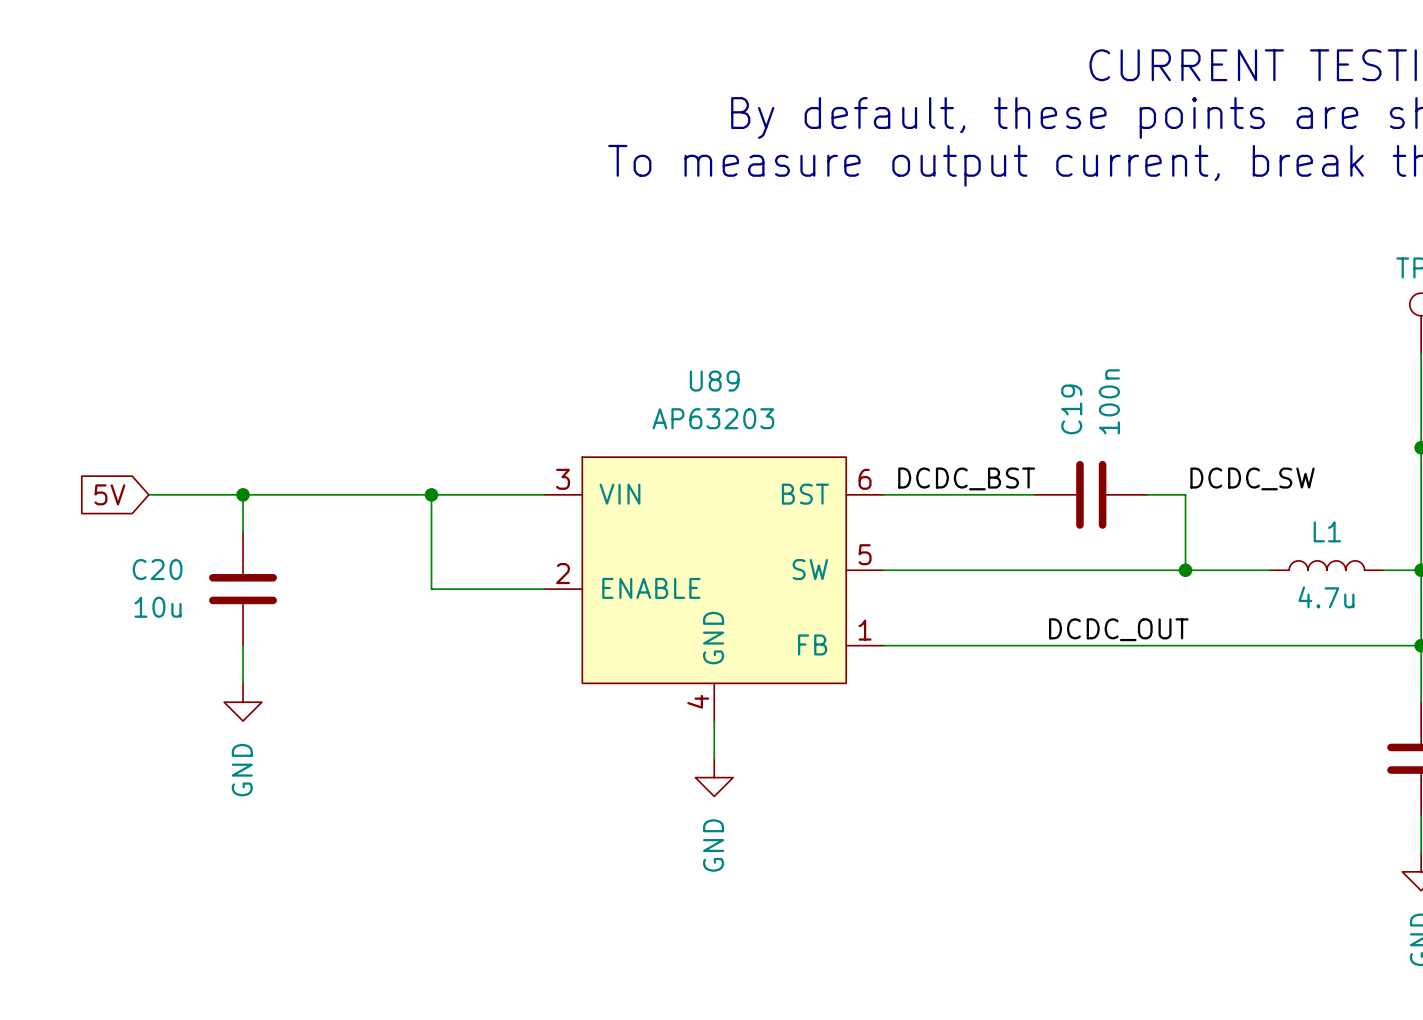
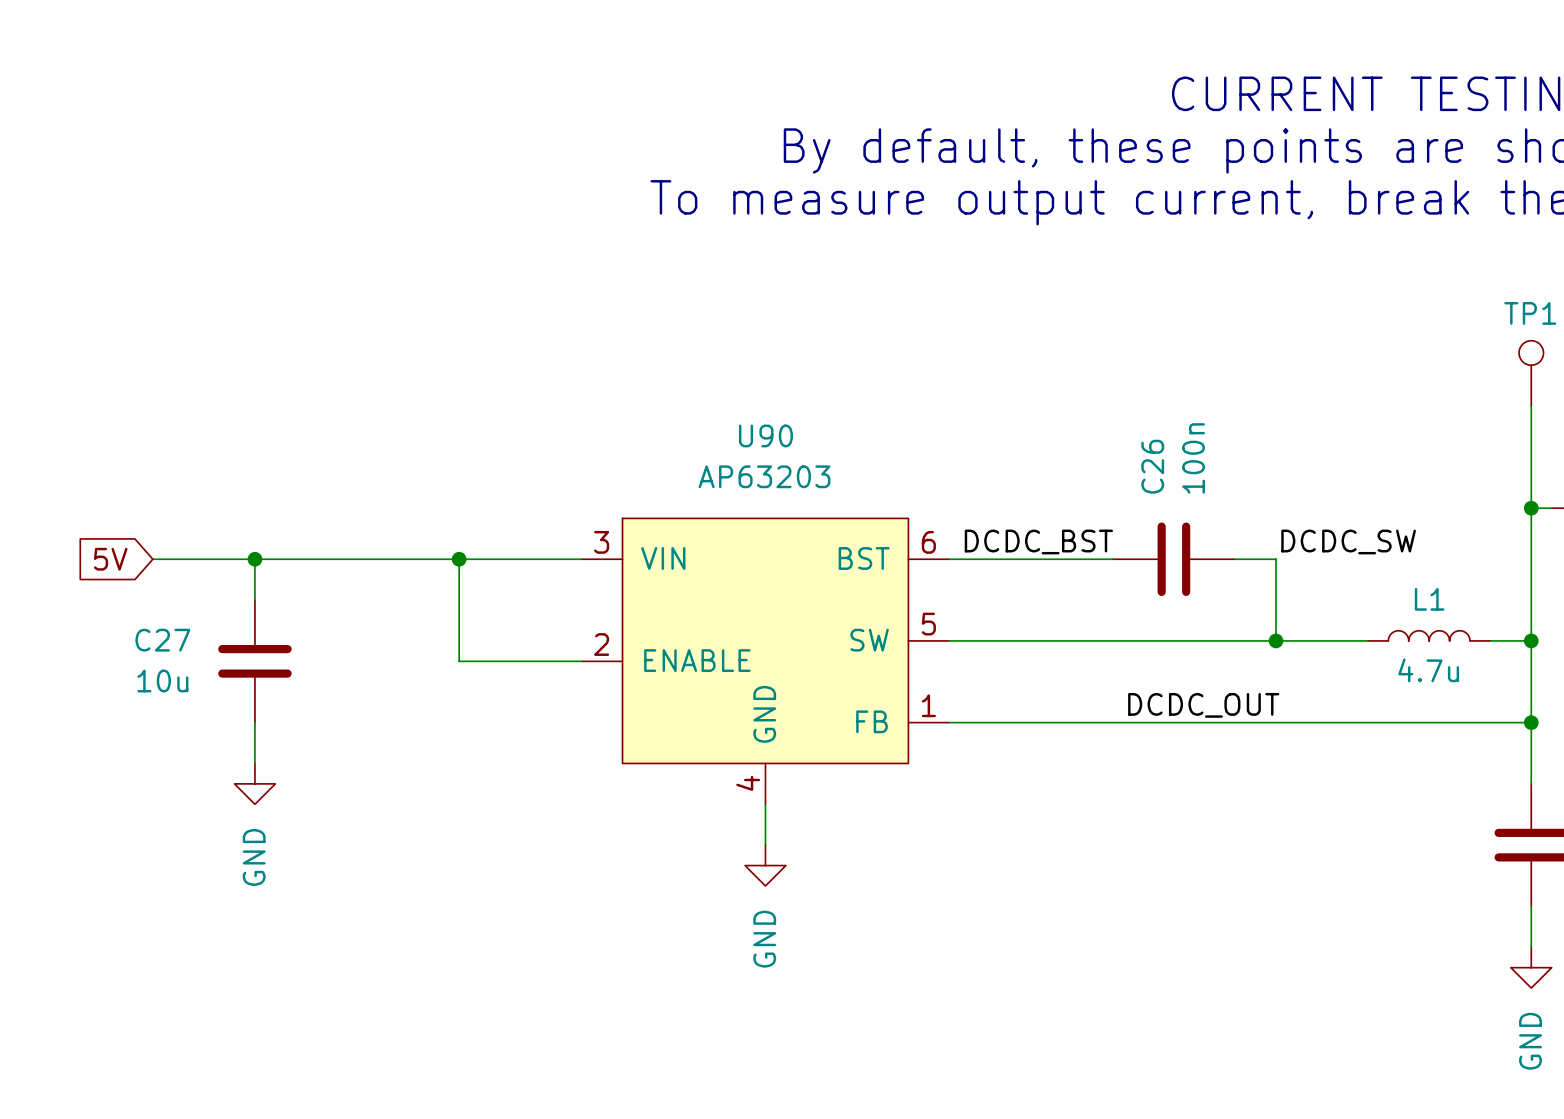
U89 name: U89 (714, 381) -> U90 (765, 435)
C19 name: C19 (1071, 409) -> C26 (1152, 466)
C20 name: C20 (157, 569) -> C27 (162, 640)

